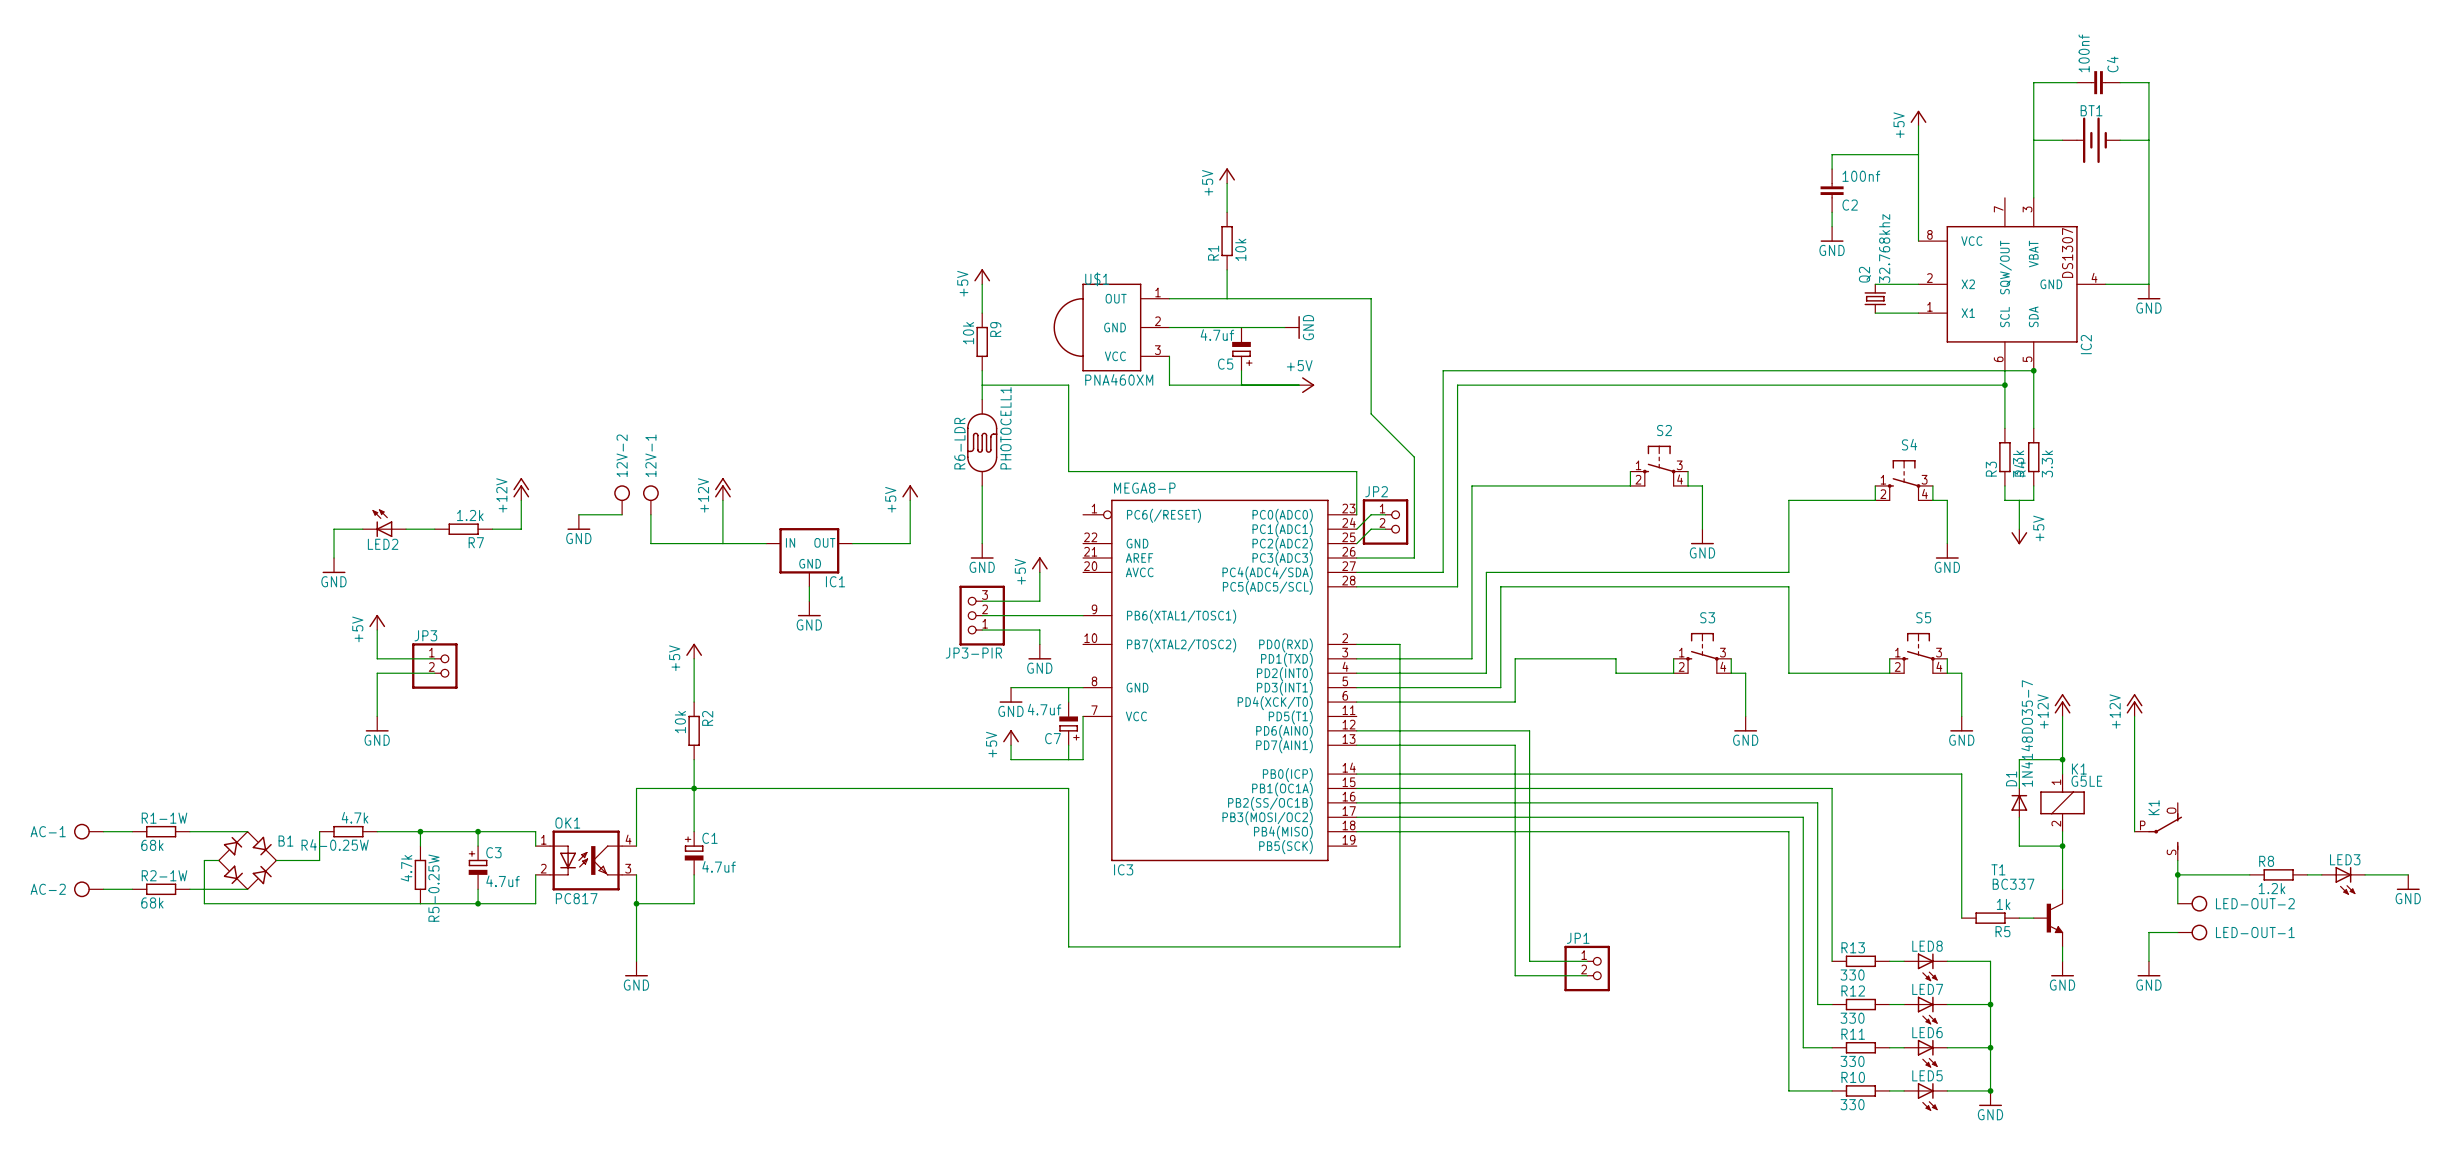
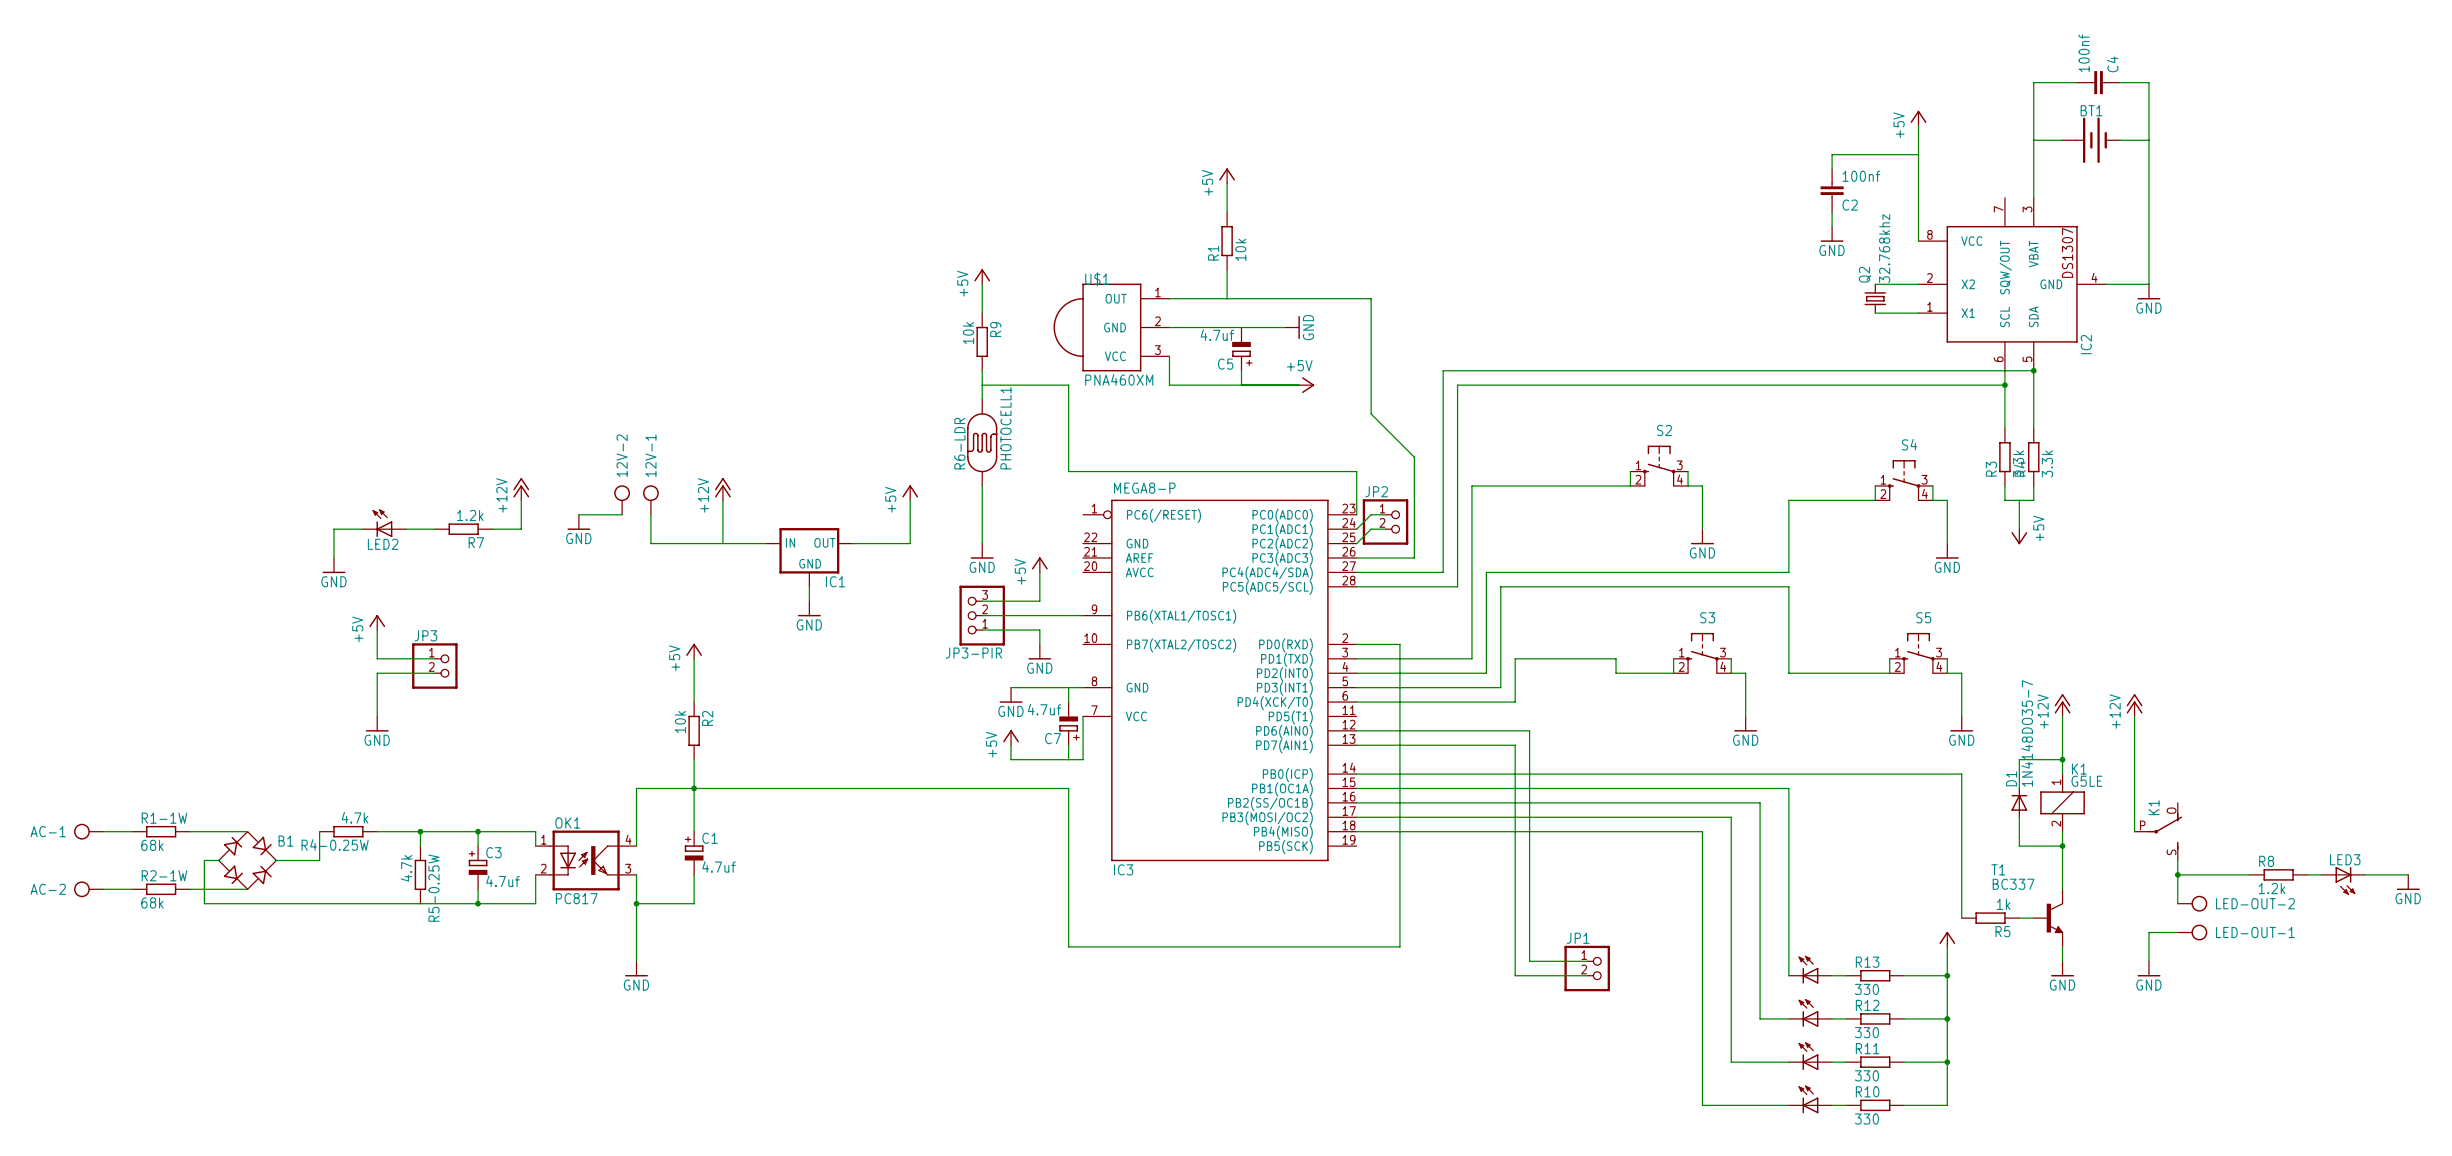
wire: (1788, 788) (1832, 788) (1832, 961) -> none
wire: (1760, 802) (1817, 802) (1817, 1004) (1832, 1004) -> (1760, 802) (1760, 1018) (1788, 1018)
wire: (1731, 817) (1803, 817) (1803, 1047) (1832, 1047) -> (1731, 817) (1731, 1062) (1788, 1062)
wire: (1702, 831) (1788, 831) -> (1788, 788) (1788, 831)
wire: none -> (1702, 831) (1702, 1105) (1788, 1105)
power symbol: none -> (1947, 939)
wire: none -> (1947, 946) (1947, 1105) (1904, 1105)
R13 position: (1860, 961) -> (1875, 975)
wire: (1889, 961) (1904, 961) -> (1832, 975) (1846, 975)
wire: (1947, 961) (1990, 961) (1990, 1090) (1947, 1090) -> none
LED8: (1925, 967) -> none
part: none -> (1810, 969)
wire: (1788, 975) (1788, 1090) (1832, 1090) -> none
wire: none -> (1904, 975) (1947, 975)
junction: none -> (1947, 975)
R12 position: (1860, 1004) -> (1875, 1018)
wire: (1889, 1004) (1904, 1004) -> (1832, 1018) (1846, 1018)
wire: (1947, 1004) (1990, 1004) -> (1904, 1018) (1947, 1018)
junction: (1990, 1004) -> none
LED7: (1925, 1010) -> none
part: none -> (1810, 1012)
junction: none -> (1947, 1018)
R11 position: (1860, 1047) -> (1875, 1062)
wire: (1889, 1047) (1904, 1047) -> (1832, 1062) (1846, 1062)
wire: (1947, 1047) (1990, 1047) -> (1904, 1062) (1947, 1062)
junction: (1990, 1047) -> none
LED6: (1925, 1053) -> none
part: none -> (1810, 1056)
junction: none -> (1947, 1062)
R10 position: (1860, 1090) -> (1875, 1105)
wire: (1889, 1090) (1904, 1090) -> (1832, 1105) (1846, 1105)
junction: (1990, 1090) -> none
LED5: (1925, 1096) -> none
power symbol: GND (1990, 1098) -> none
part: none -> (1810, 1099)

